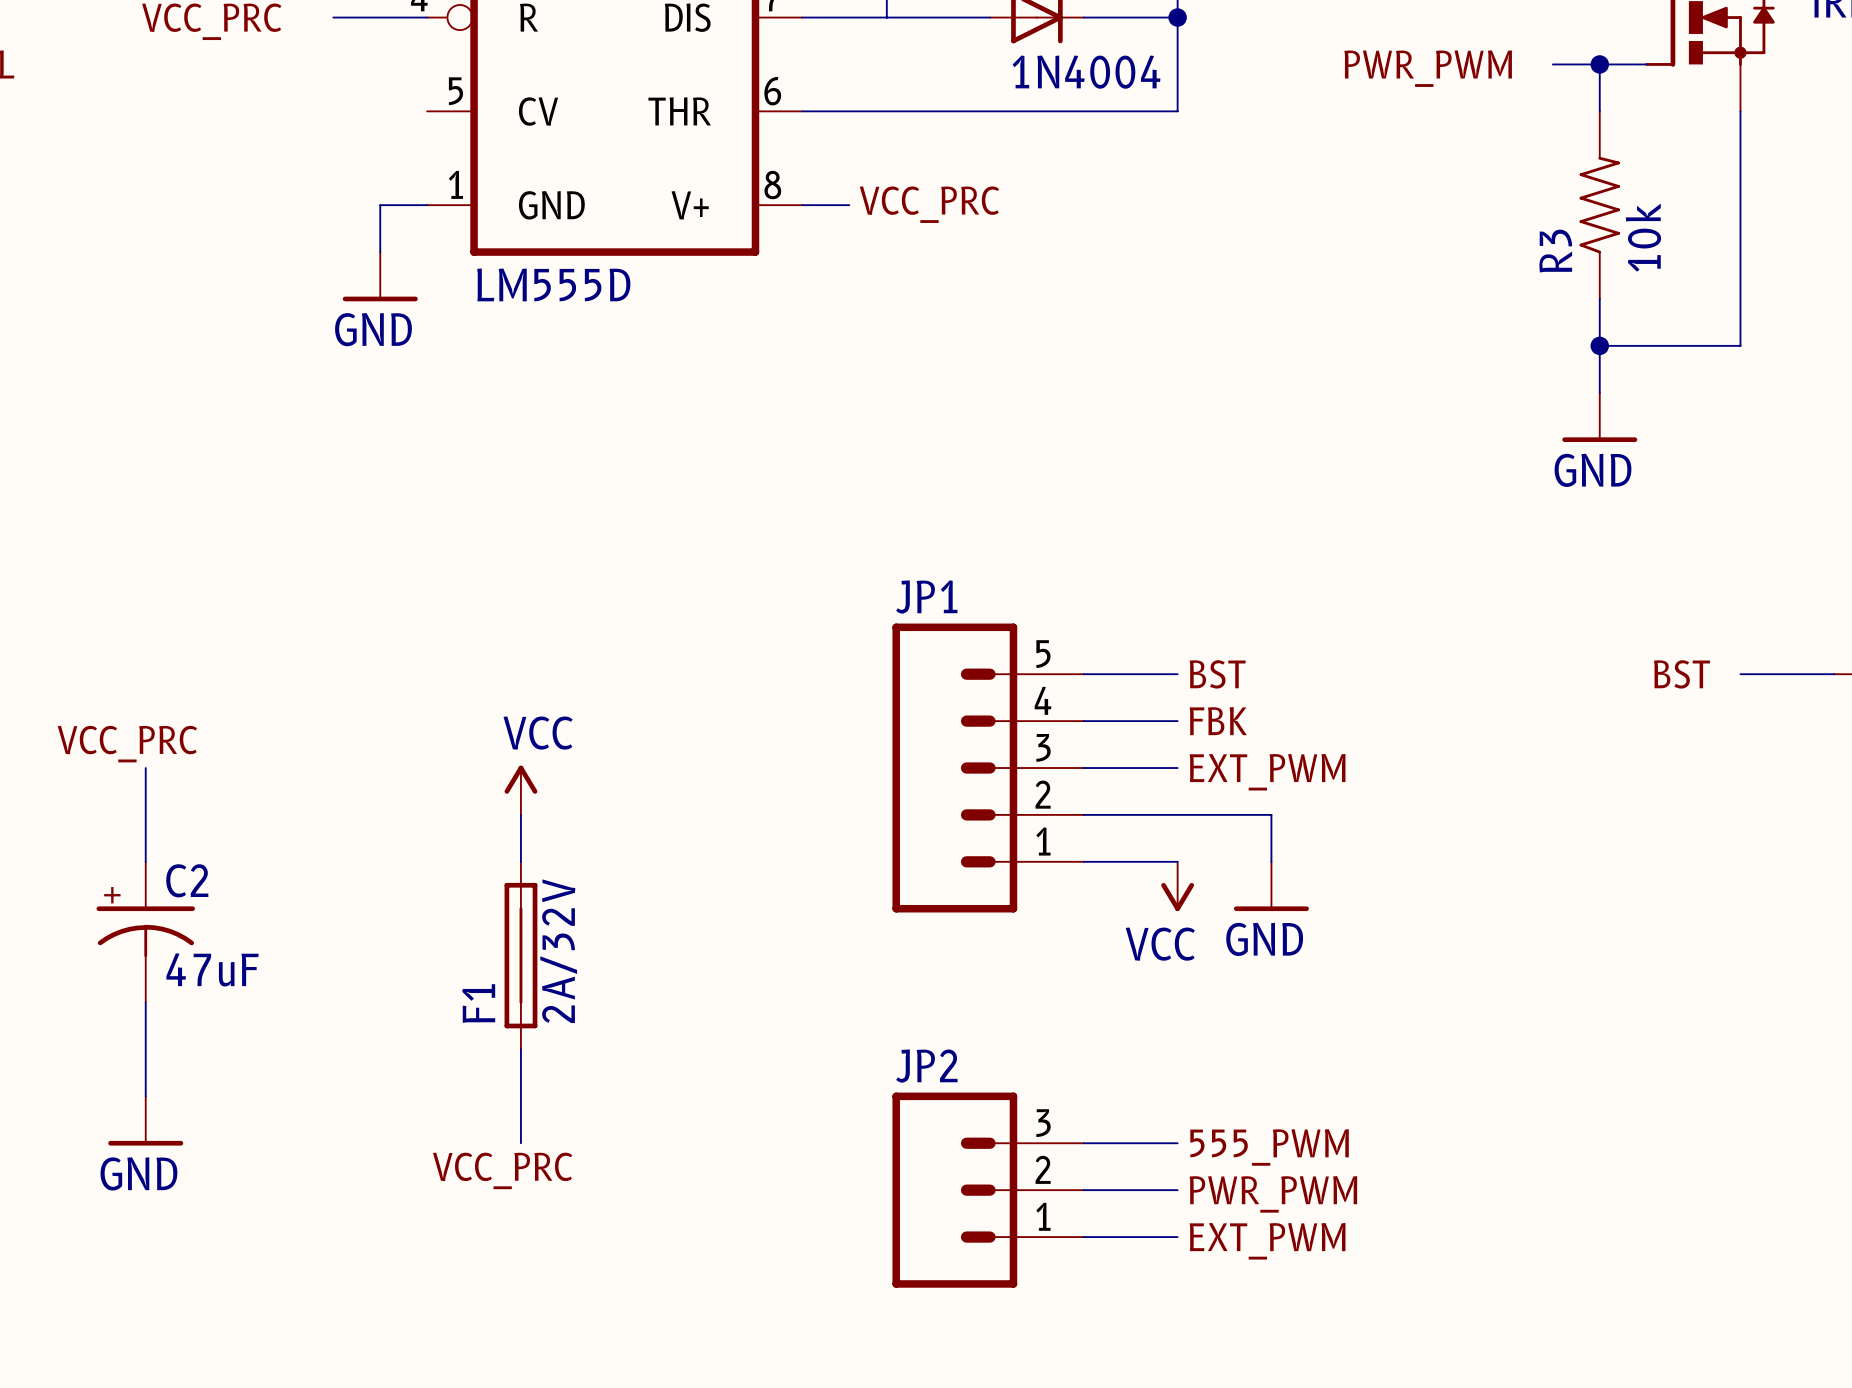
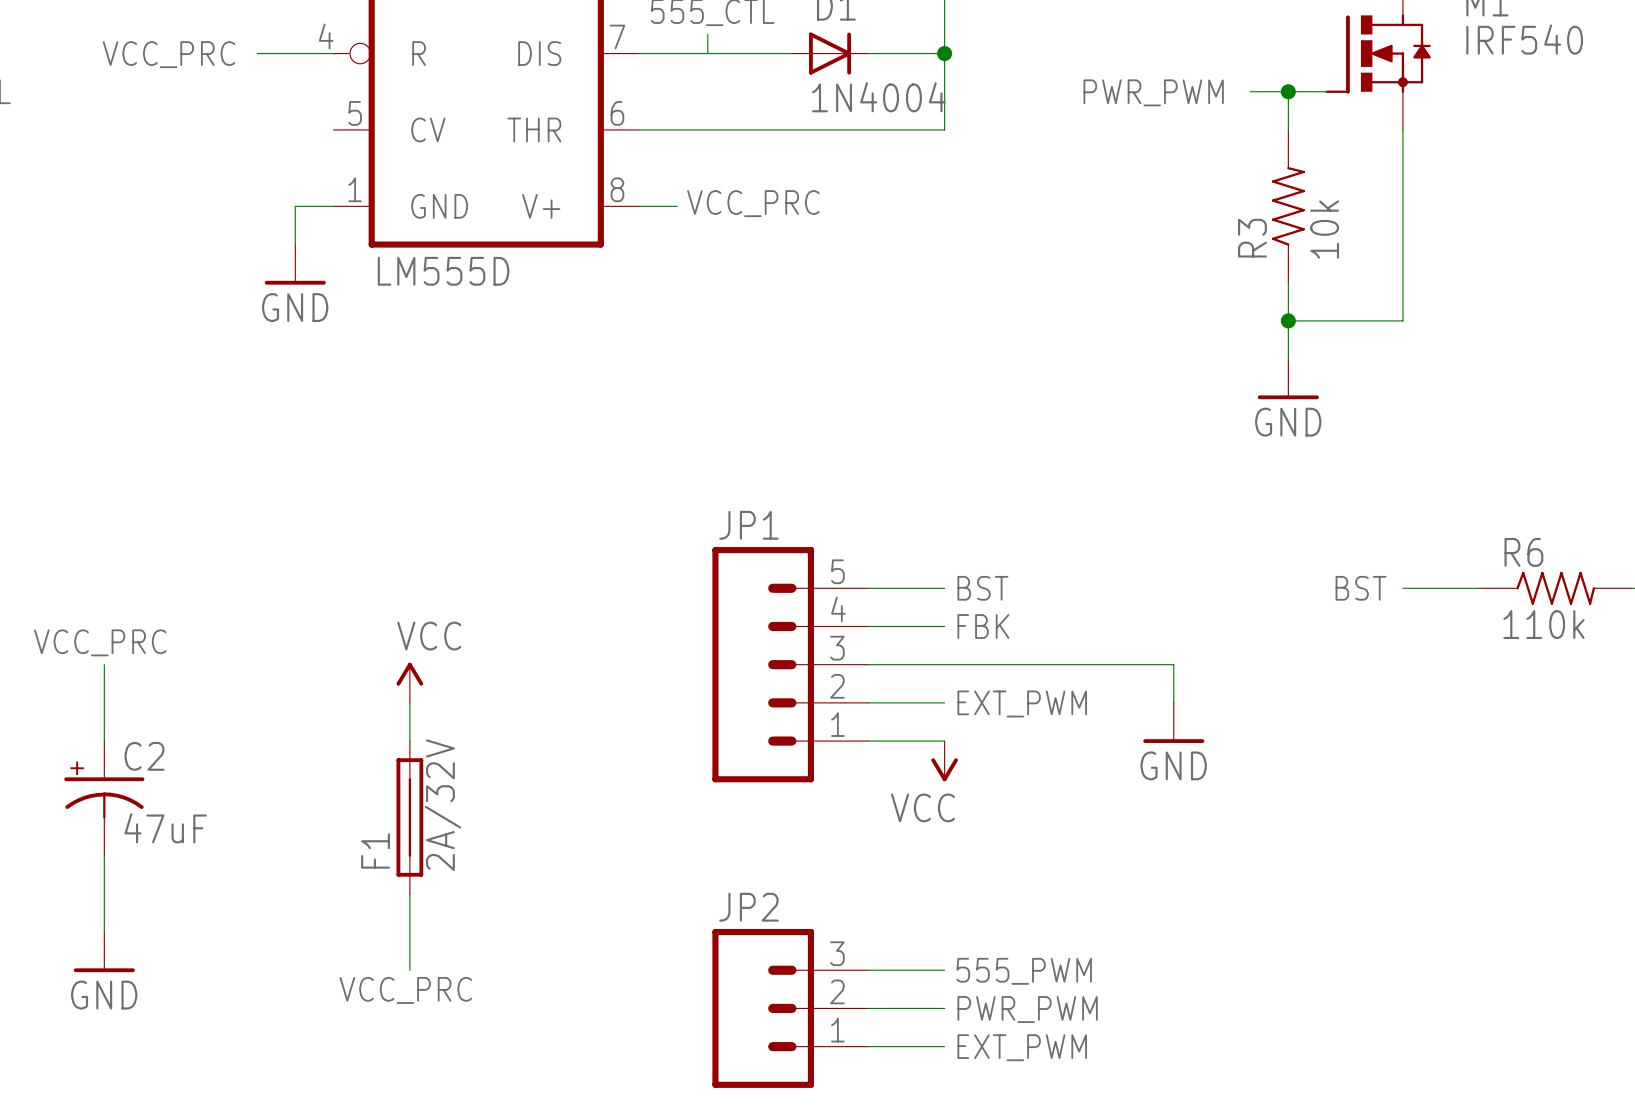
wire: none -> (944, 664) (1173, 664) (1173, 702)
label position: EXT_PWM (1267, 772) -> EXT_PWM (1022, 703)
wire: (1177, 814) (1271, 814) (1271, 861) -> none
power symbol position: GND (1271, 886) -> GND (1173, 722)

